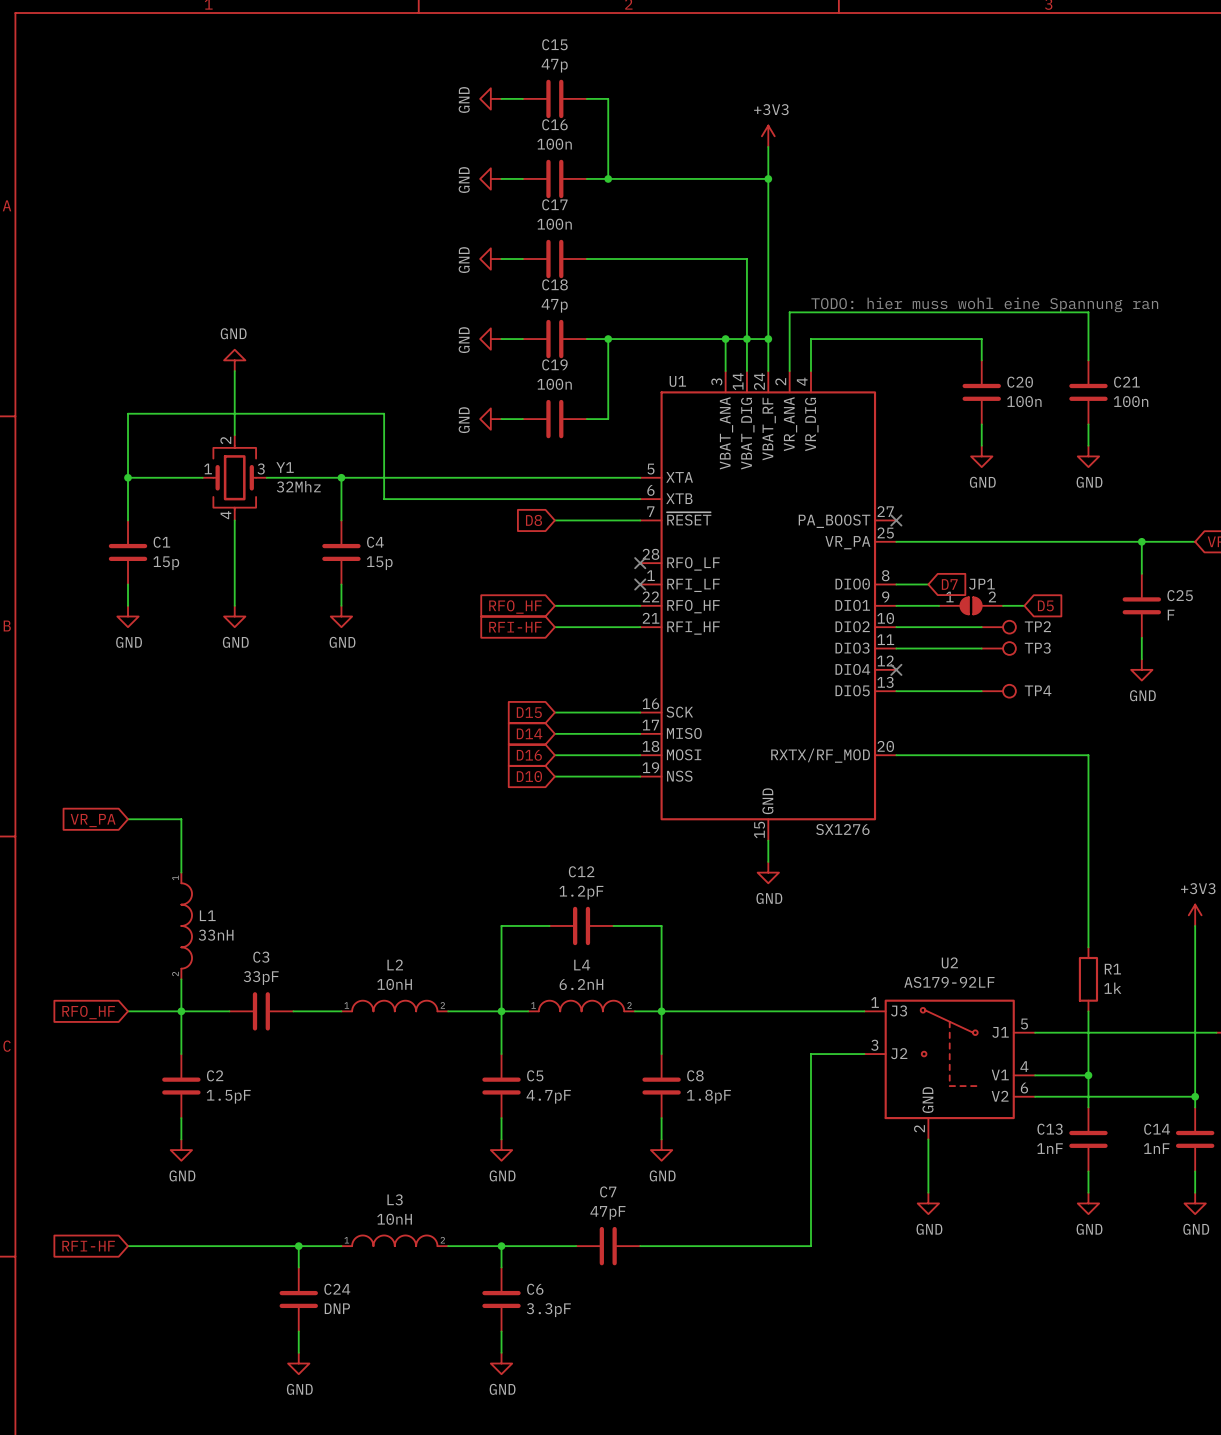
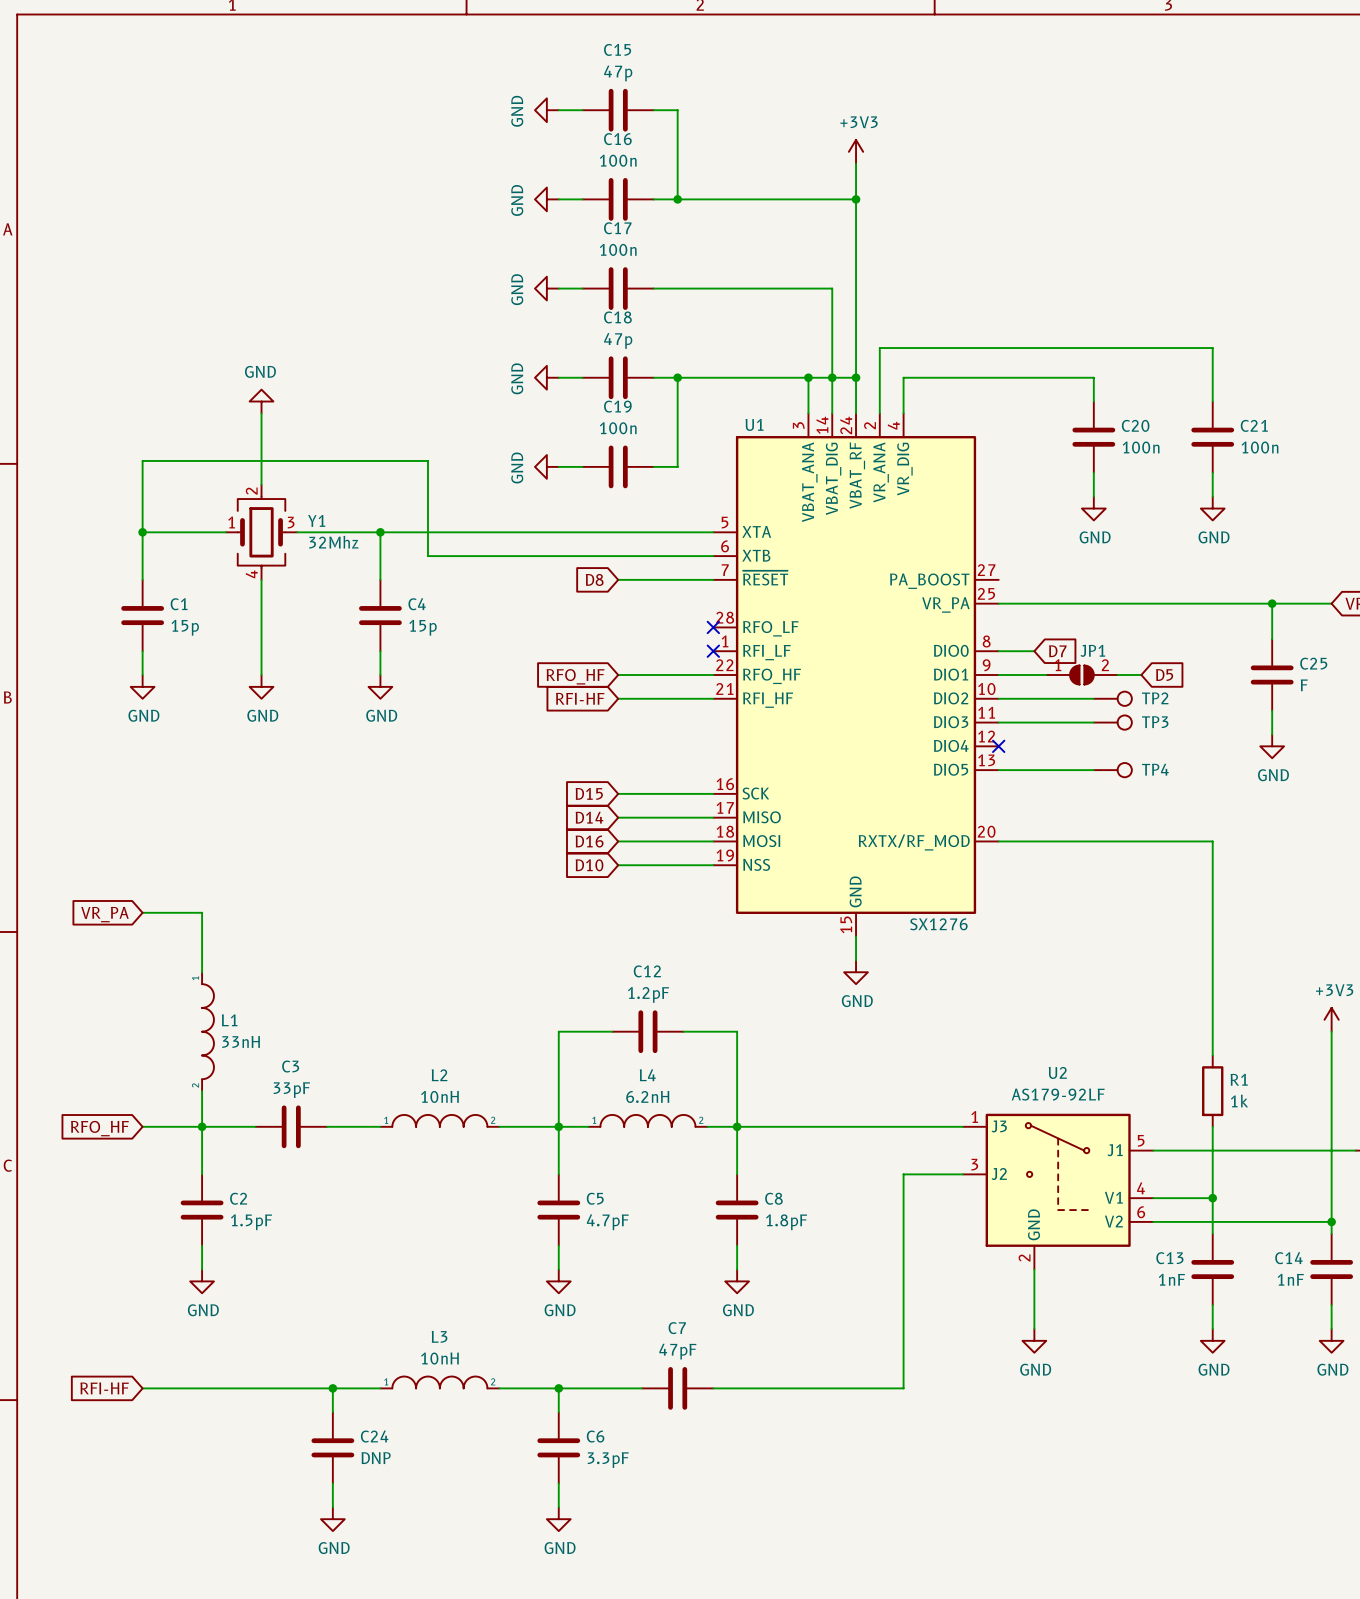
text: TODO: hier muss wohl eine Spannung ran (984, 304) -> none
no-connect mark: (896, 520) -> none

